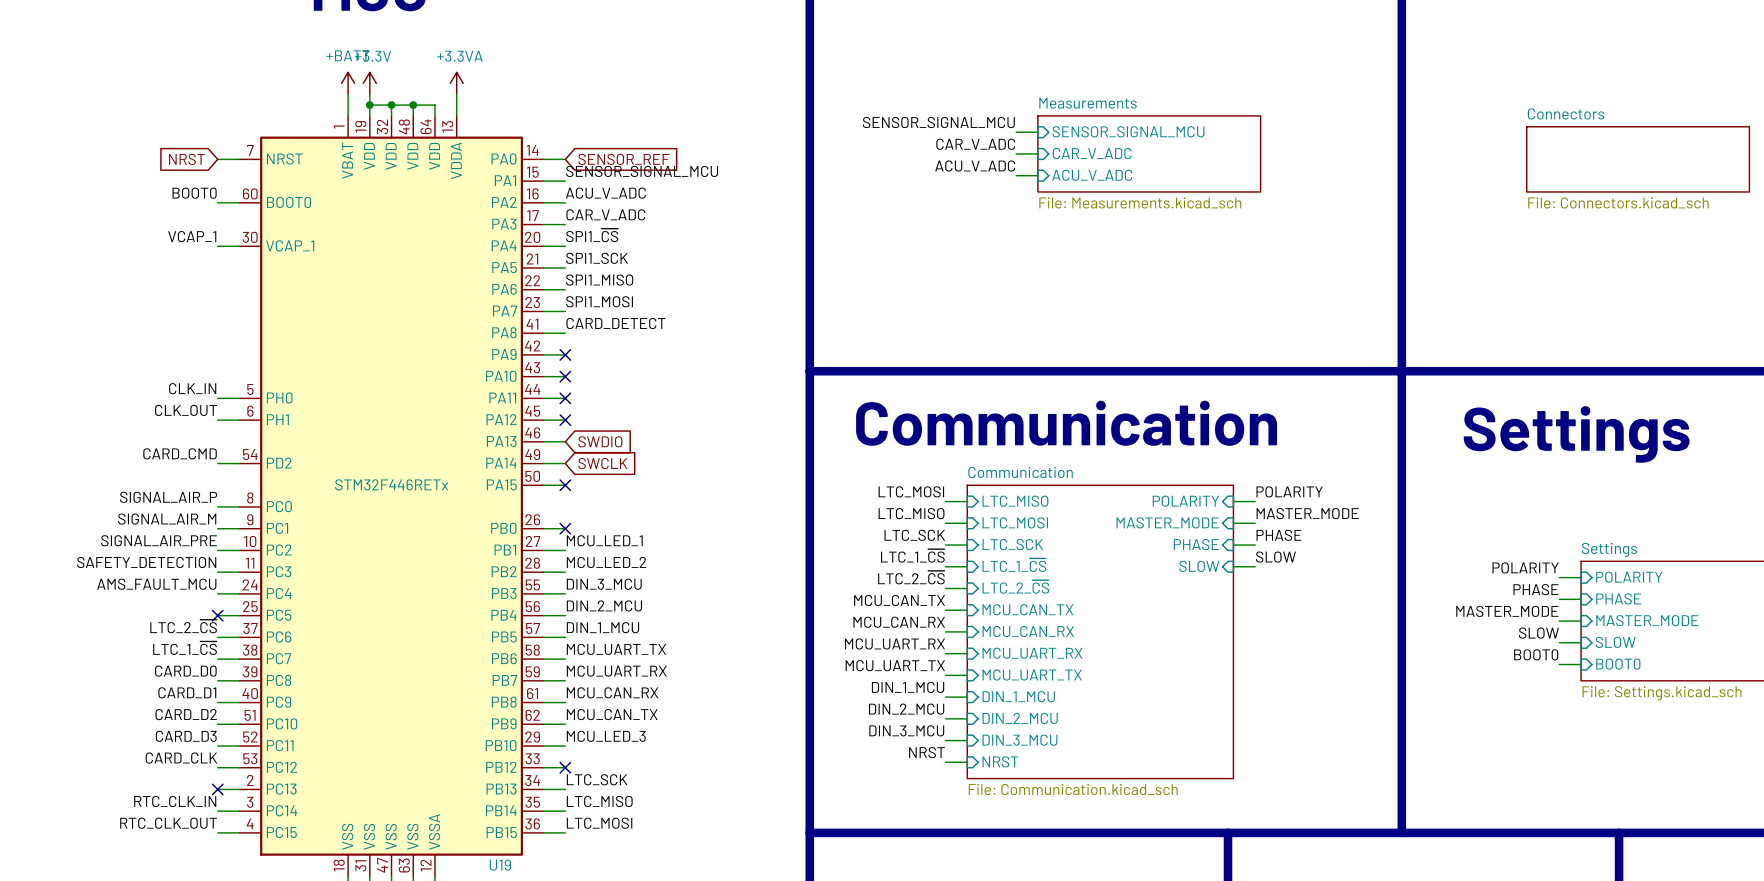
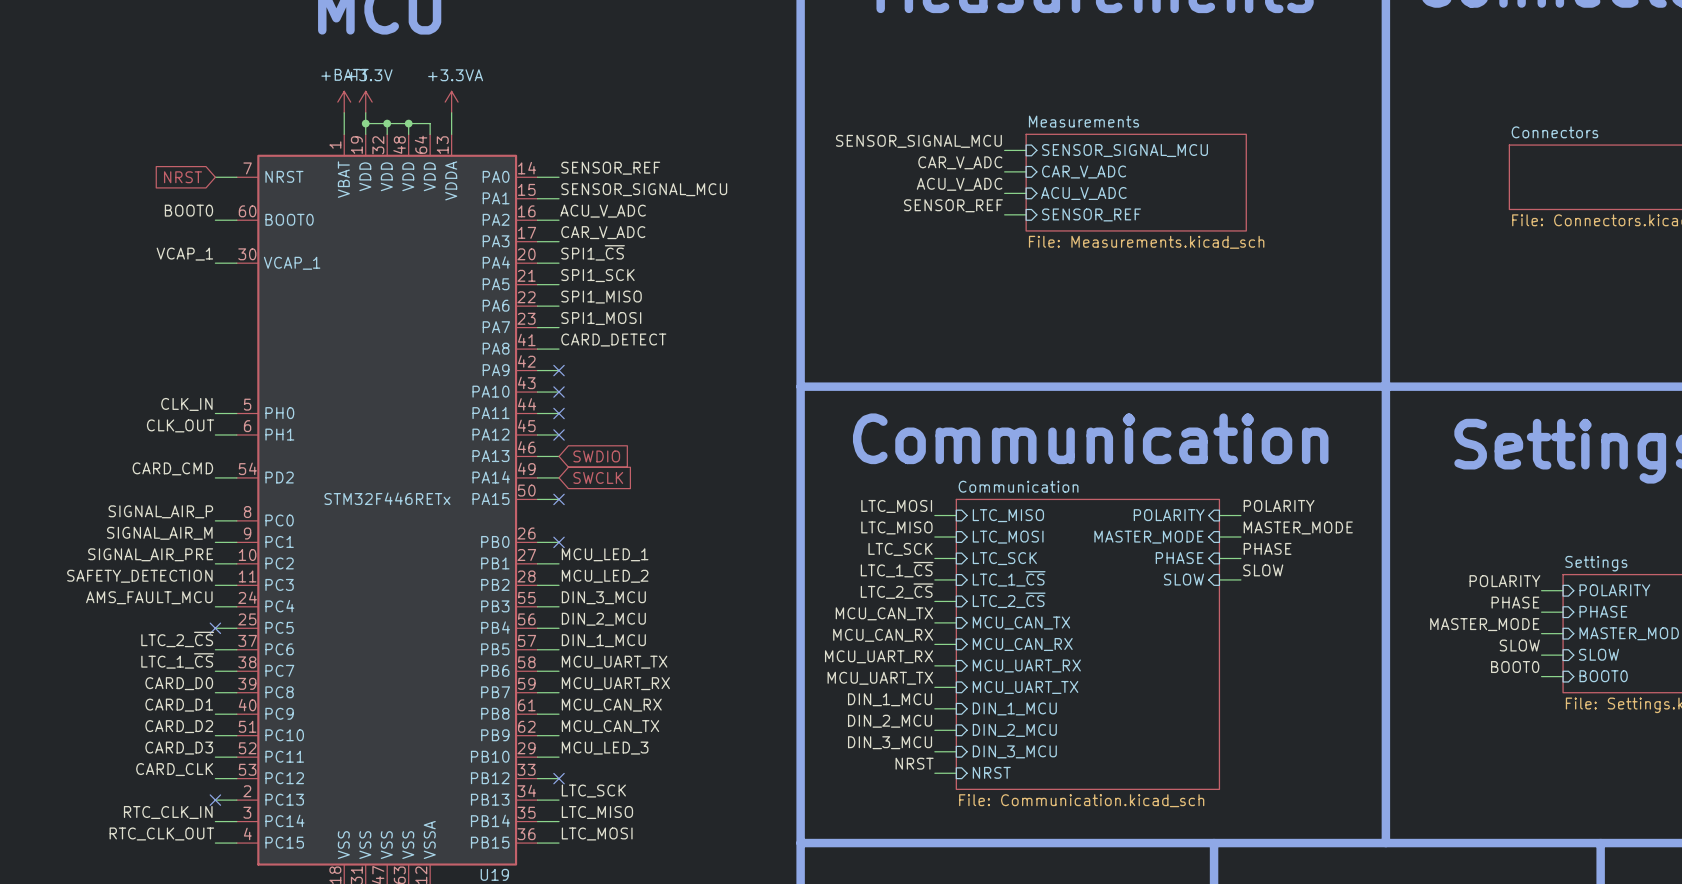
label: none -> SENSOR_REF (610, 168)
sheet Measurements: File: Measurements.kicad_sch (1149, 153) -> none
global label: SENSOR_REF (623, 159) -> none
sheet Measurements: none -> File: Measurements.kicad_sch (1136, 182)
label: none -> SENSOR_REF (953, 205)
wire: none -> (1004, 214) (1026, 214)
sheet pin: none -> SENSOR_REF (1091, 214)

